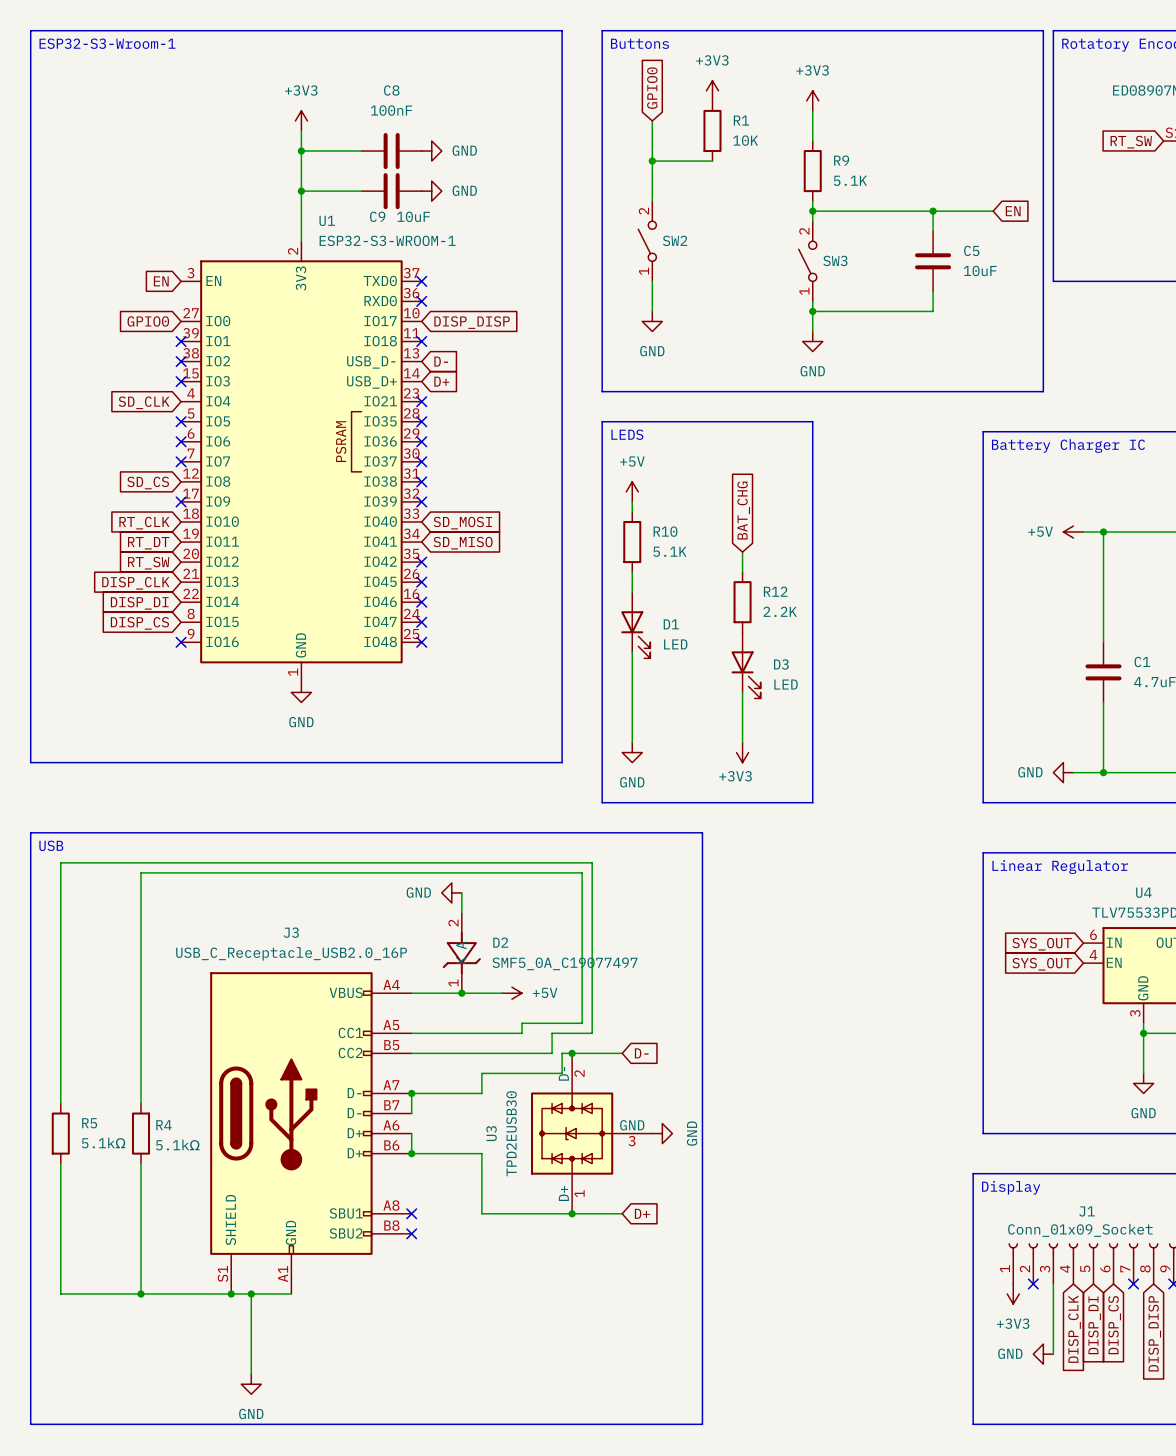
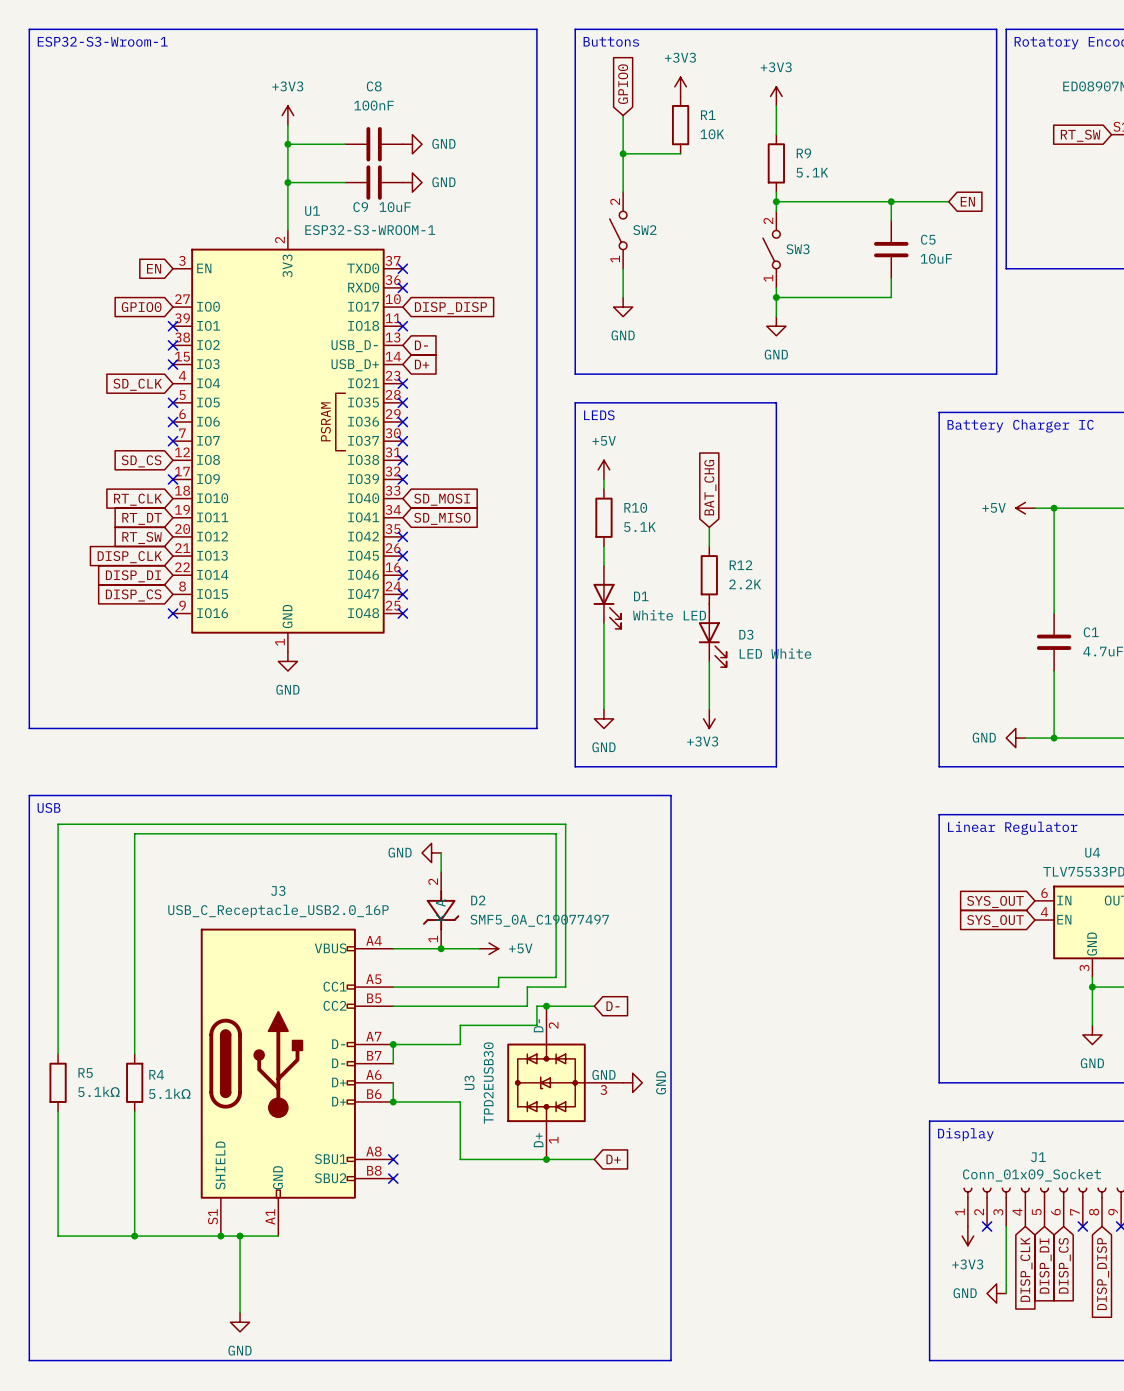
D1 value: LED (675, 644) -> White LED (669, 615)
D3 value: LED (786, 684) -> LED White (775, 653)

